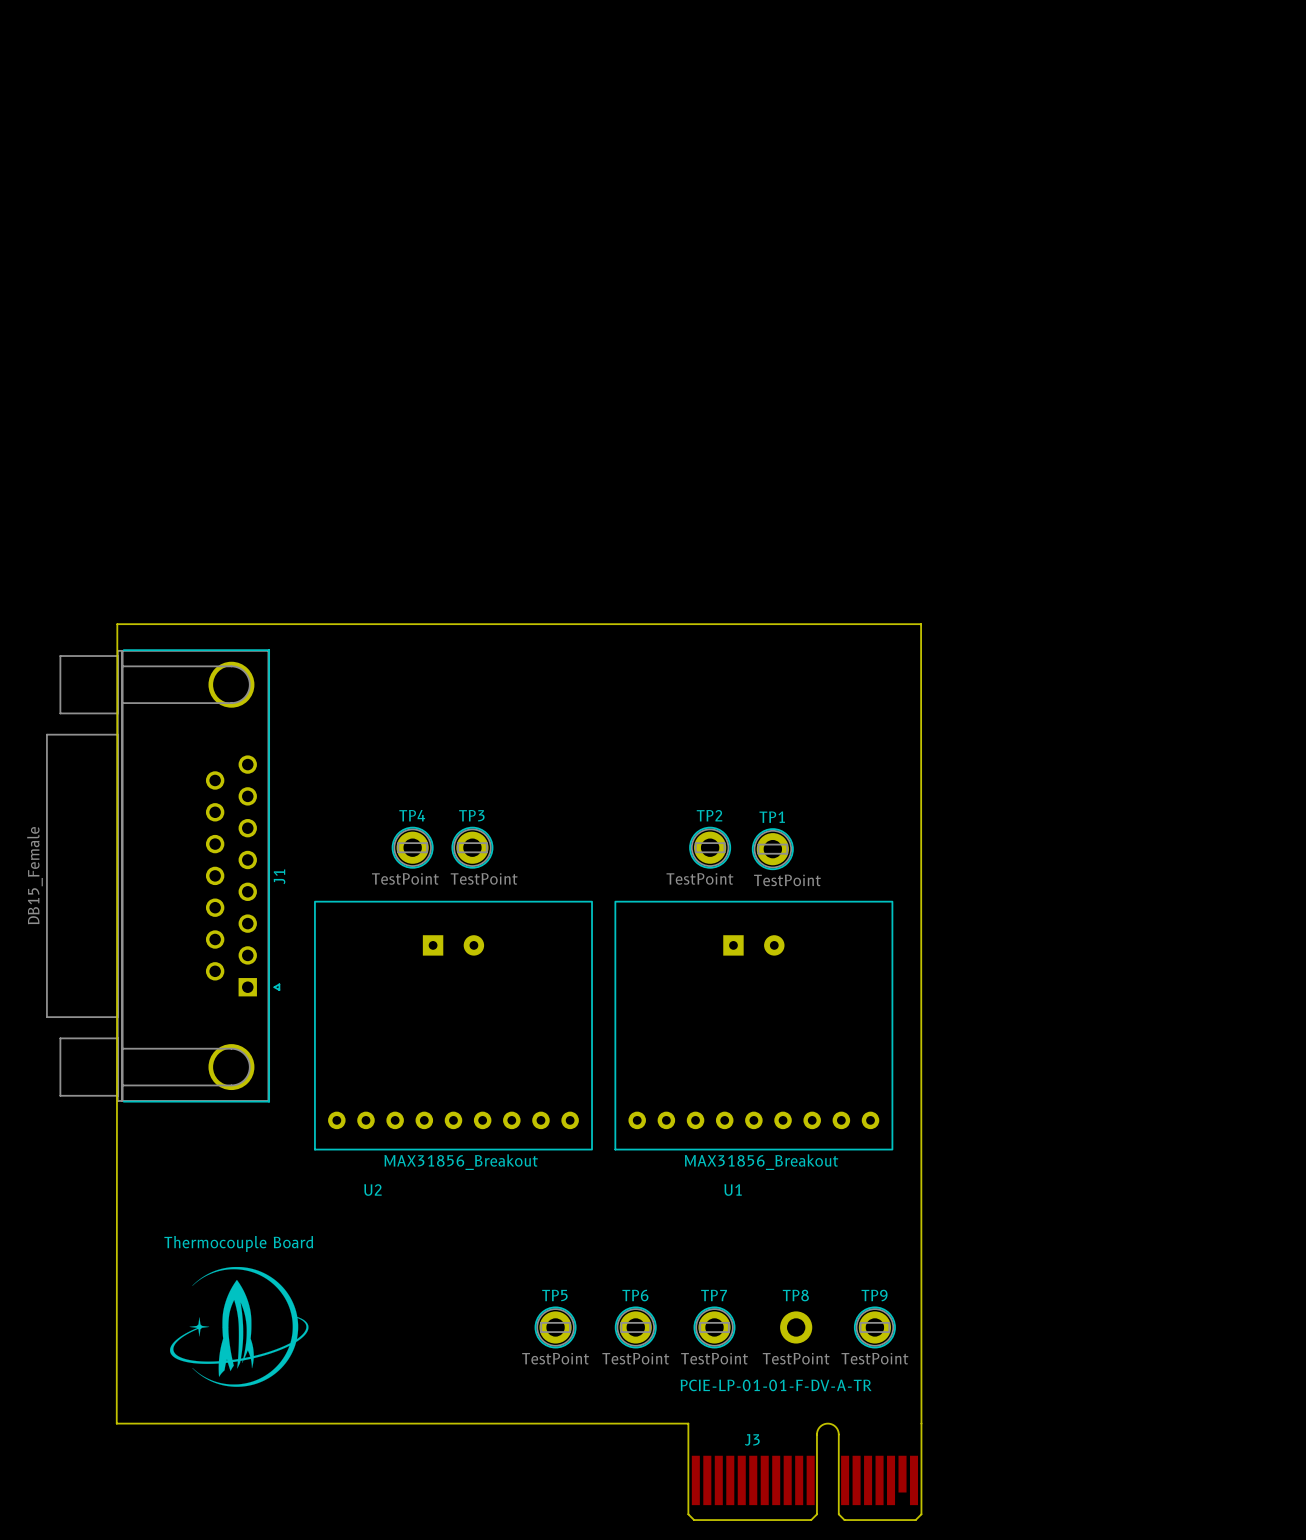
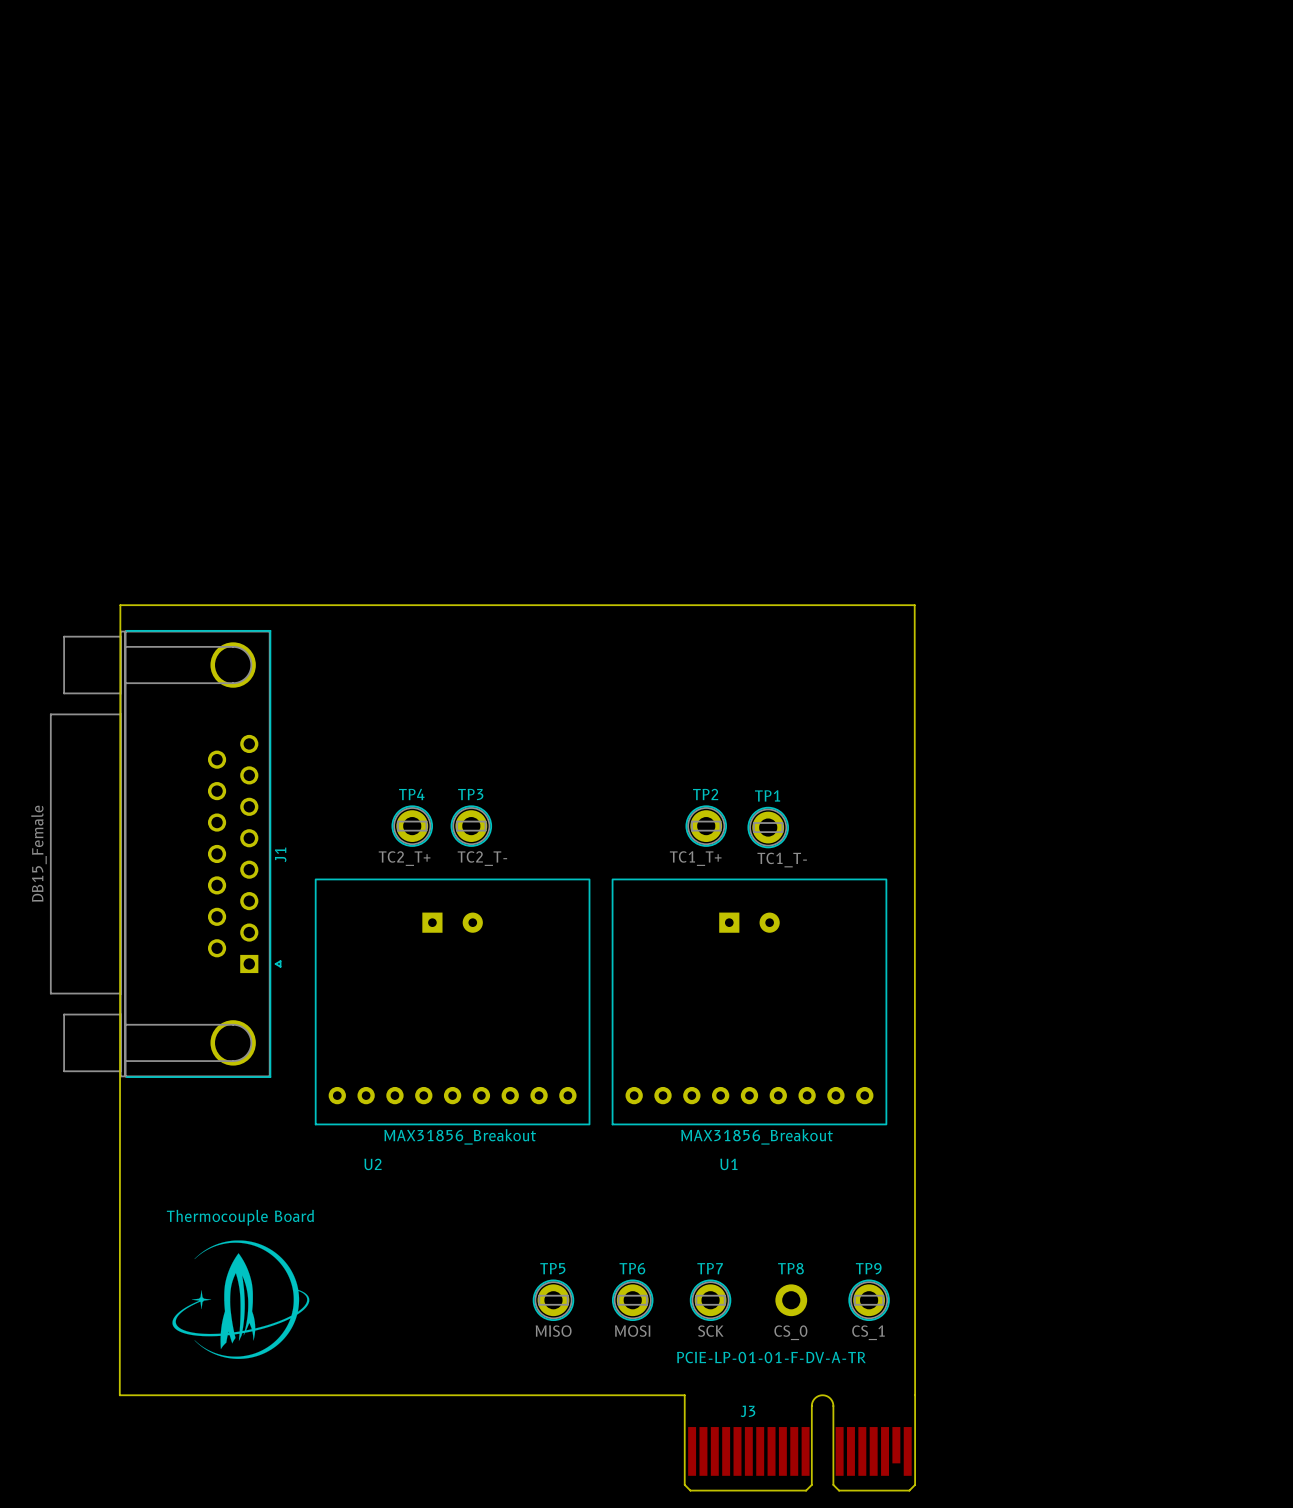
TP4 value: TestPoint (405, 878) -> TC2_T+ (404, 858)
TP3 value: TestPoint (484, 878) -> TC2_T- (482, 858)
TP2 value: TestPoint (699, 878) -> TC1_T+ (695, 858)
TP1 value: TestPoint (787, 880) -> TC1_T- (782, 860)
TP5 value: TestPoint (555, 1358) -> MISO (553, 1331)
TP6 value: TestPoint (635, 1358) -> MOSI (632, 1331)
TP7 value: TestPoint (714, 1358) -> SCK (710, 1331)
TP8 value: TestPoint (796, 1358) -> CS_0 (790, 1332)
TP9 value: TestPoint (874, 1358) -> CS_1 (868, 1332)

